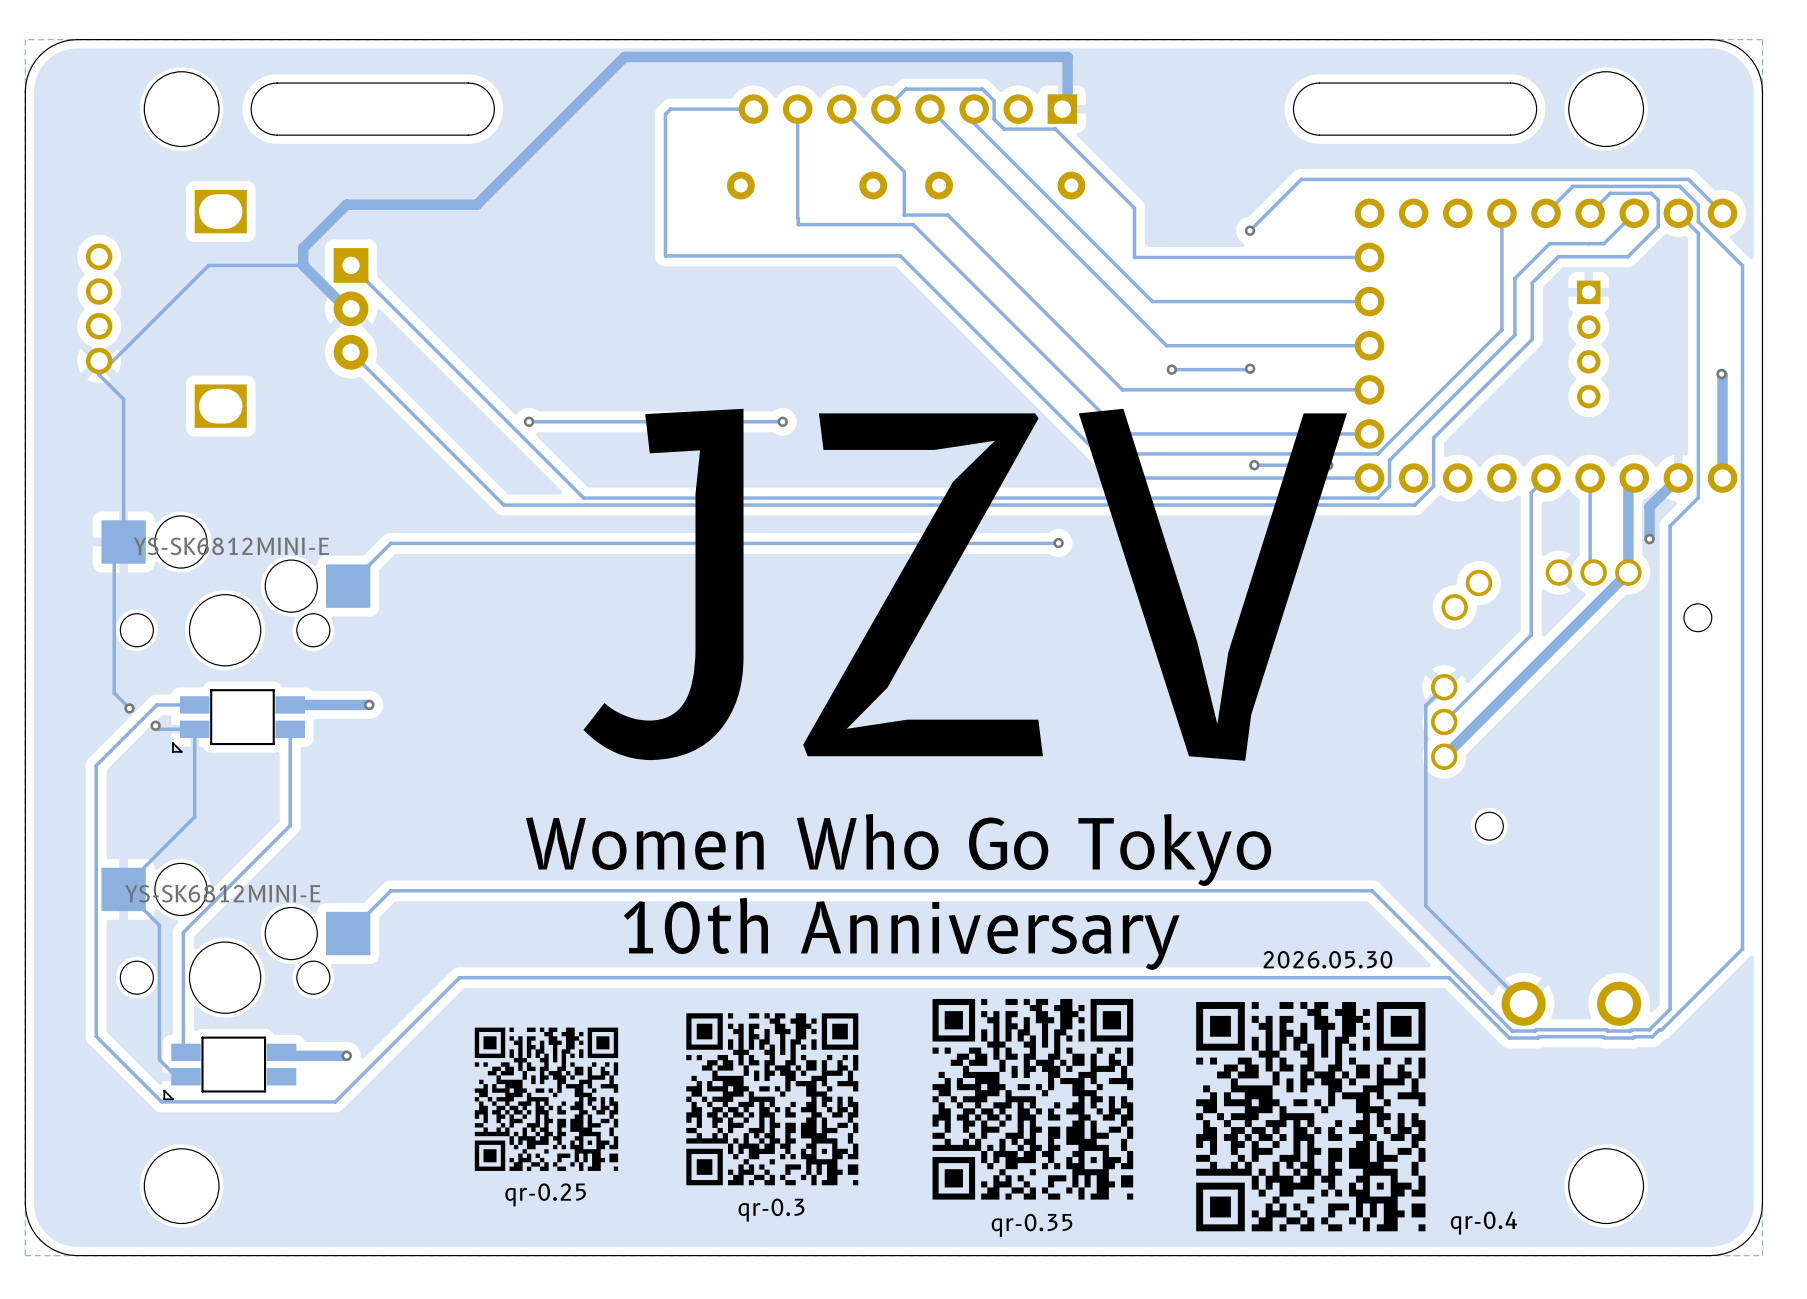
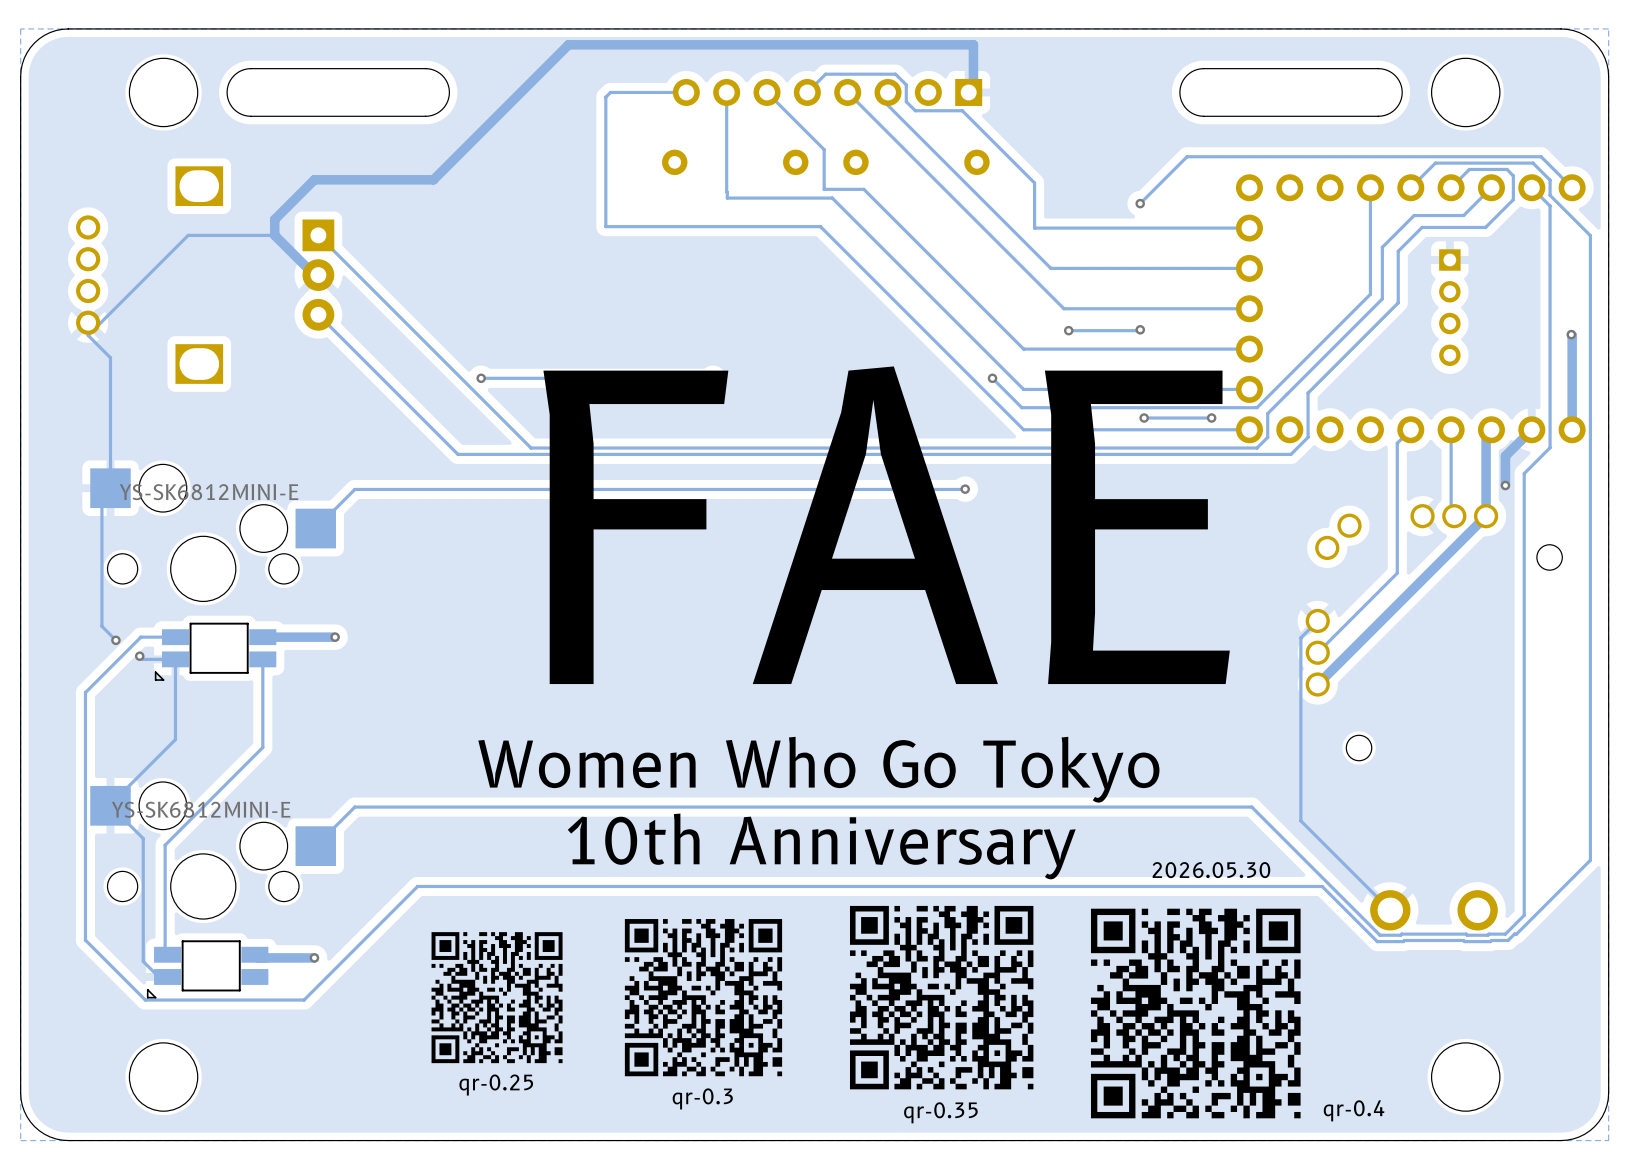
text: JZV (965, 584) -> FAE (886, 525)

